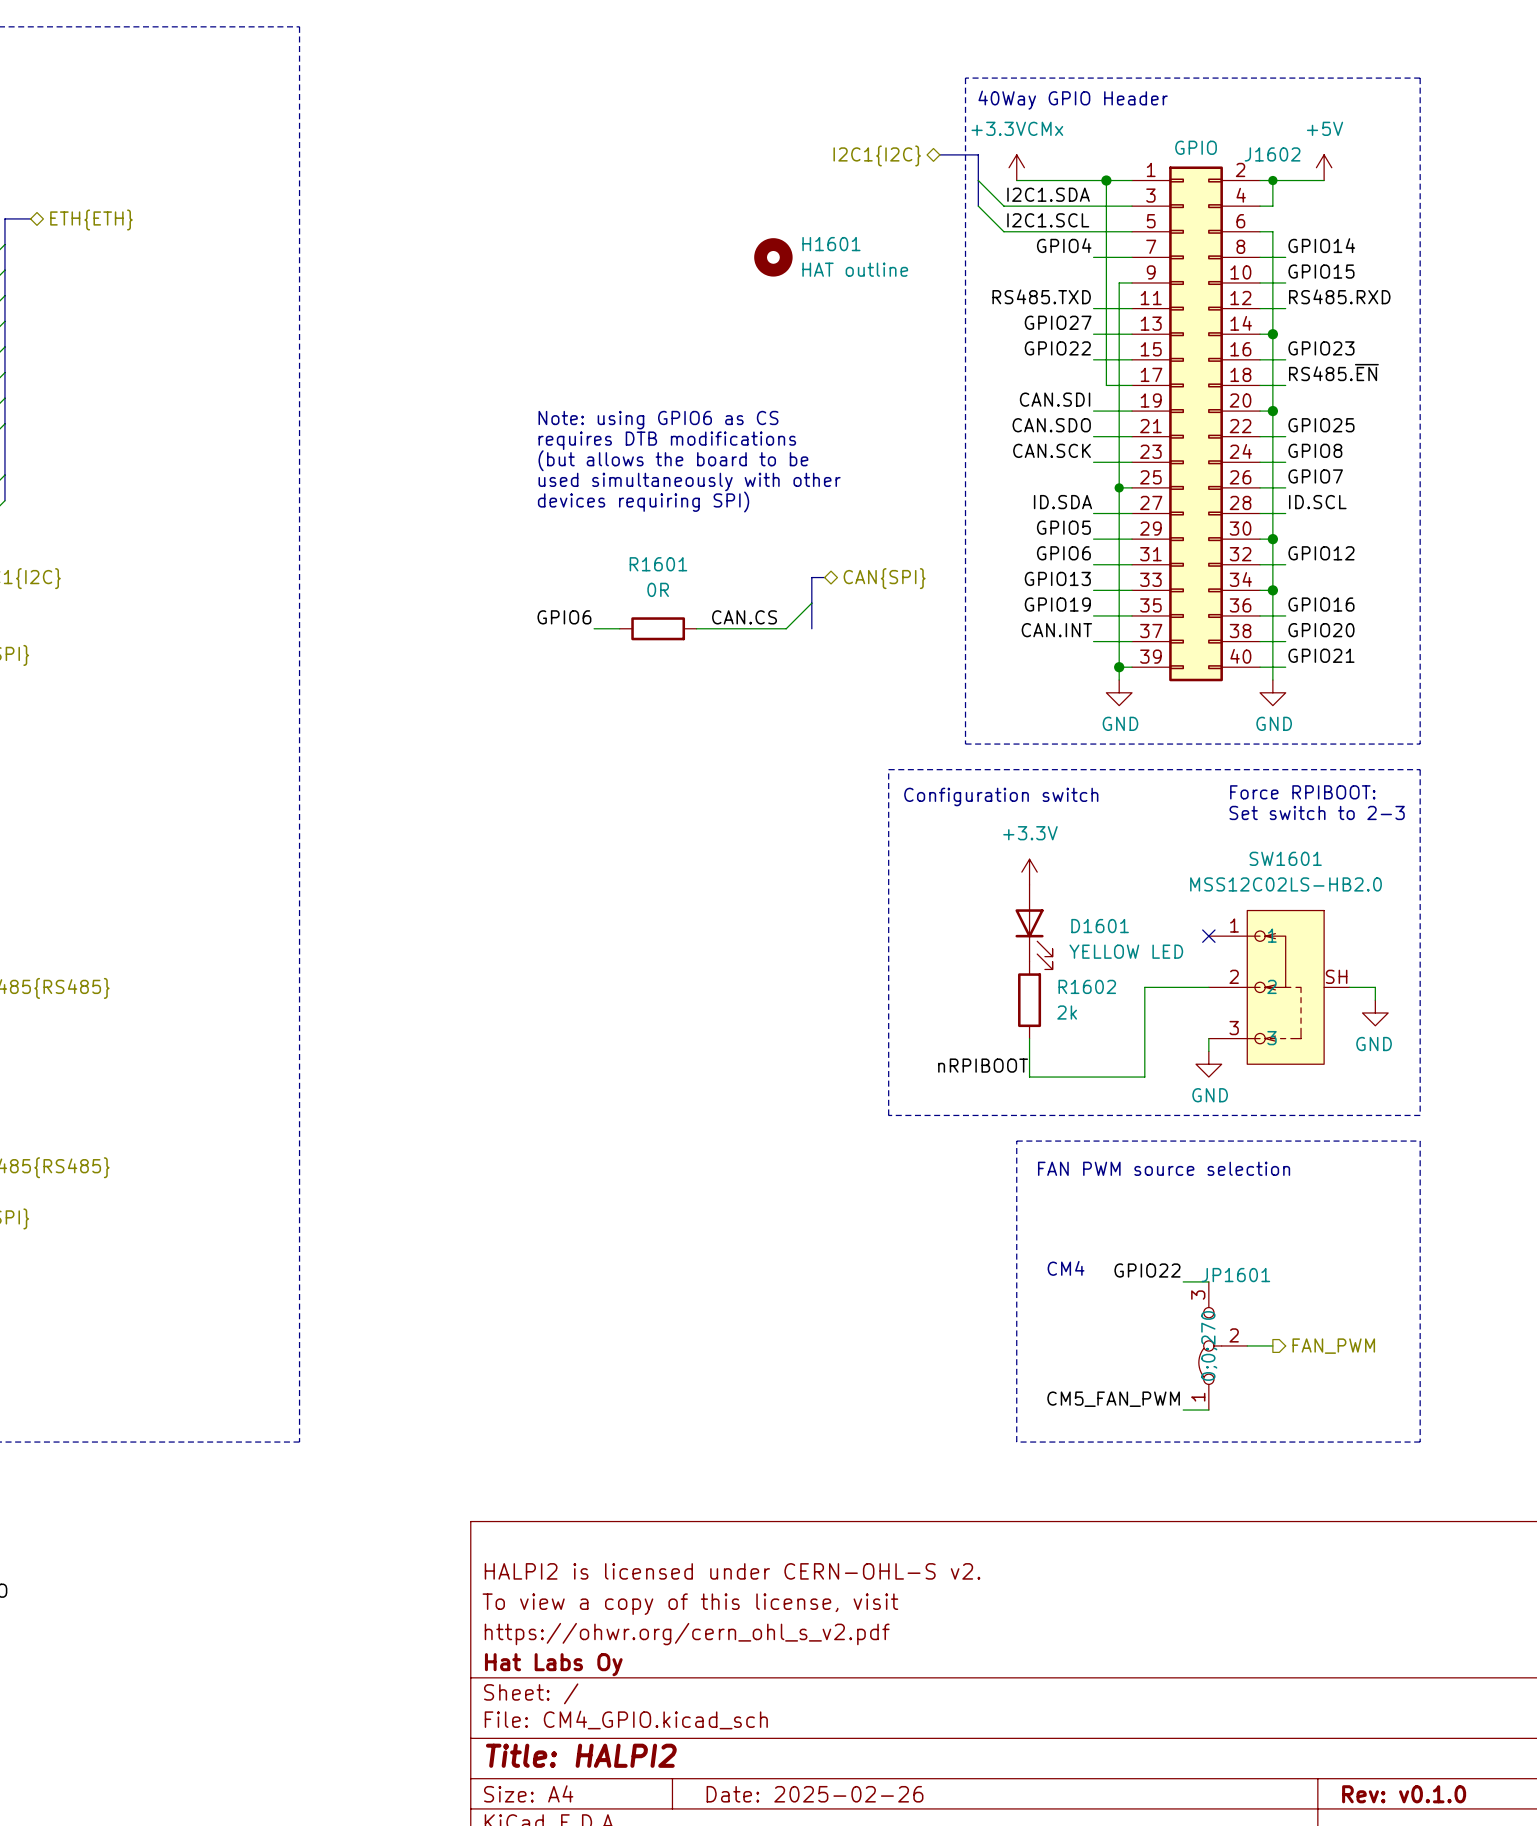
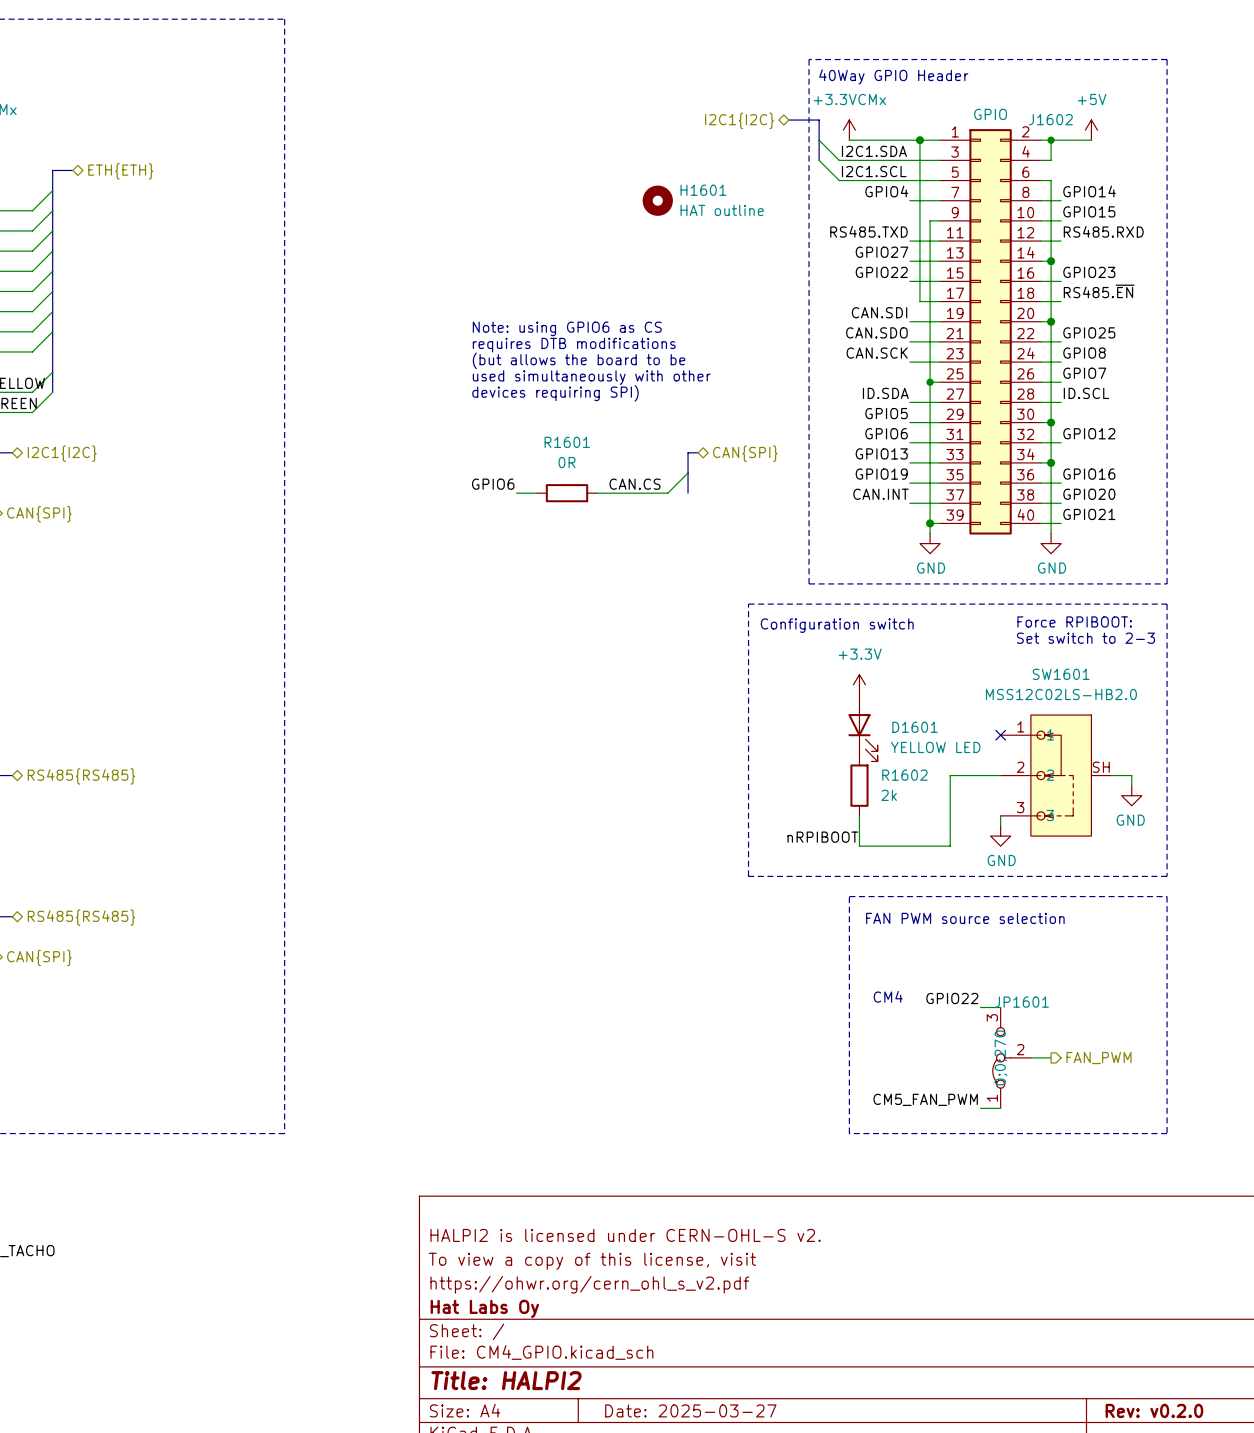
title block: Date: 2025-02-26 (815, 1794) -> Date: 2025-03-27 (690, 1410)
title block: Rev: v0.1.0 (1404, 1794) -> Rev: v0.2.0 (1154, 1410)

